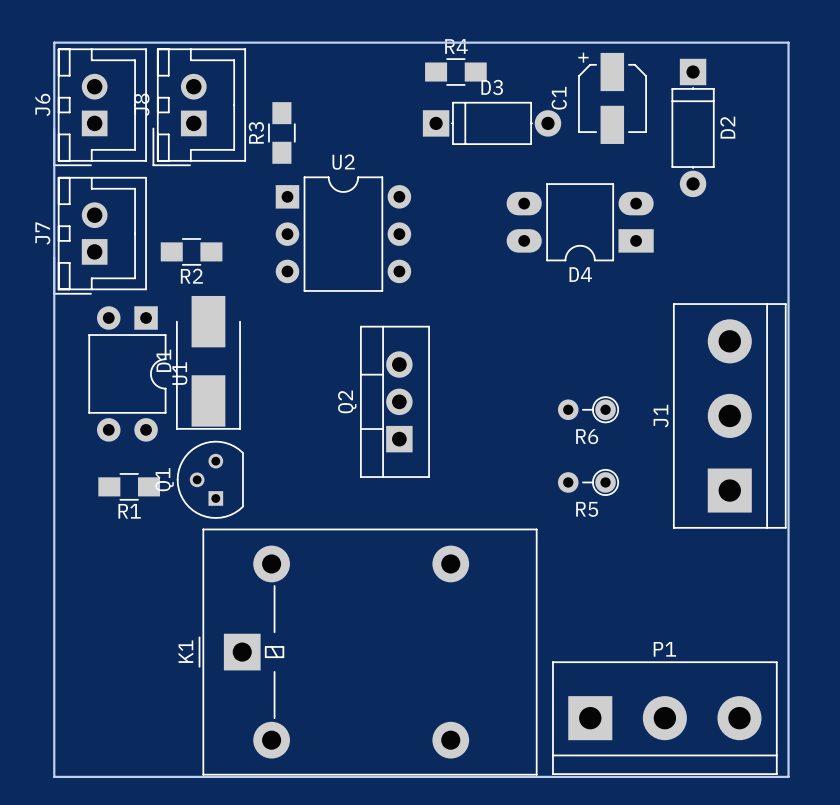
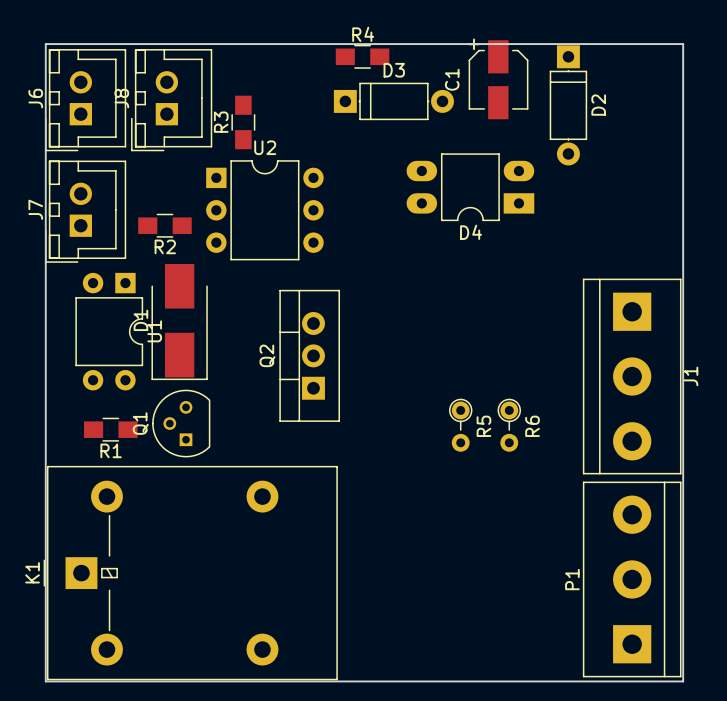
R4 position: (455, 72) -> (362, 56)
C1 position: (612, 98) -> (498, 79)
D3 position: (492, 123) -> (393, 101)
D2 position: (693, 127) -> (568, 105)
D4 position: (580, 222) -> (470, 187)
U2 position: (343, 234) -> (264, 210)
Q2 position: (394, 401) -> (309, 355)
R6 rotation: 0° (588, 409) -> 90° counterclockwise (509, 425)
R6 position: (588, 409) -> (509, 425)
J1 rotation: 0° (729, 415) -> 180° (632, 376)
R5 rotation: 0° (588, 482) -> 90° counterclockwise (460, 425)
R5 position: (588, 482) -> (460, 425)
K1 position: (368, 652) -> (190, 573)
P1 rotation: 0° (664, 718) -> 90° counterclockwise (632, 579)

